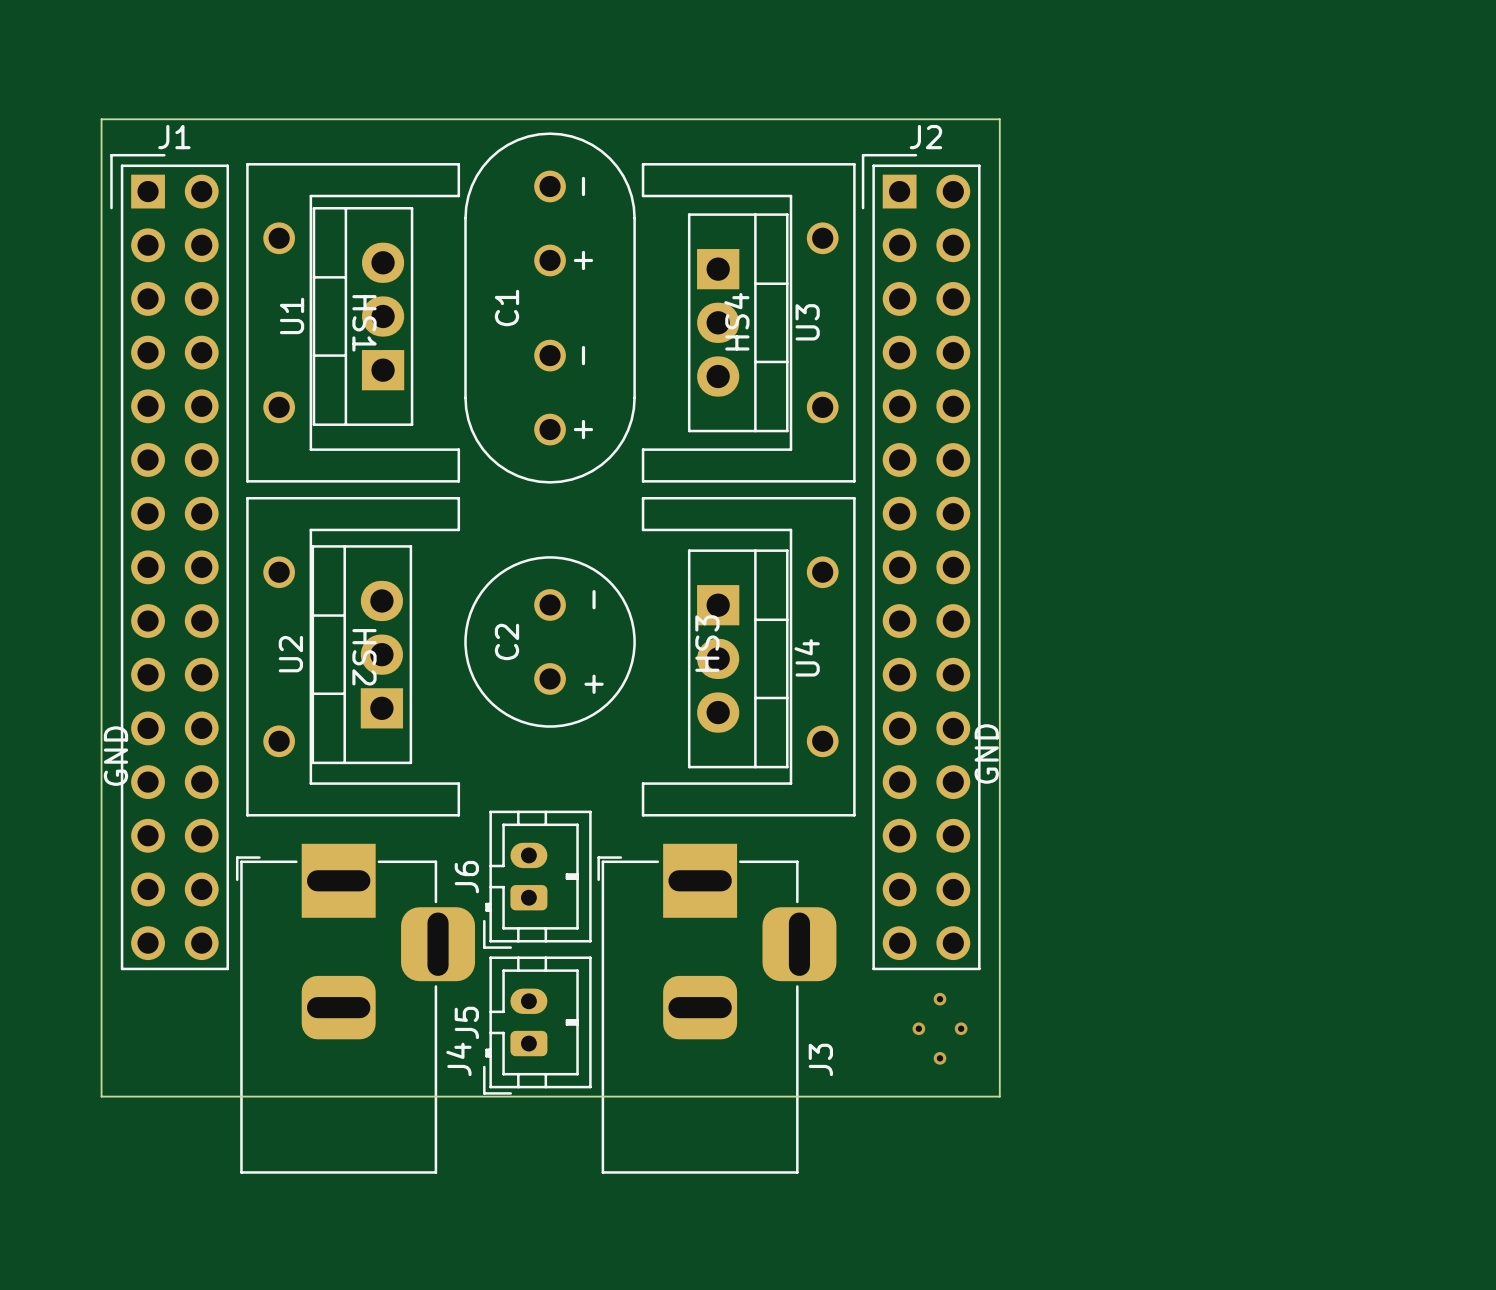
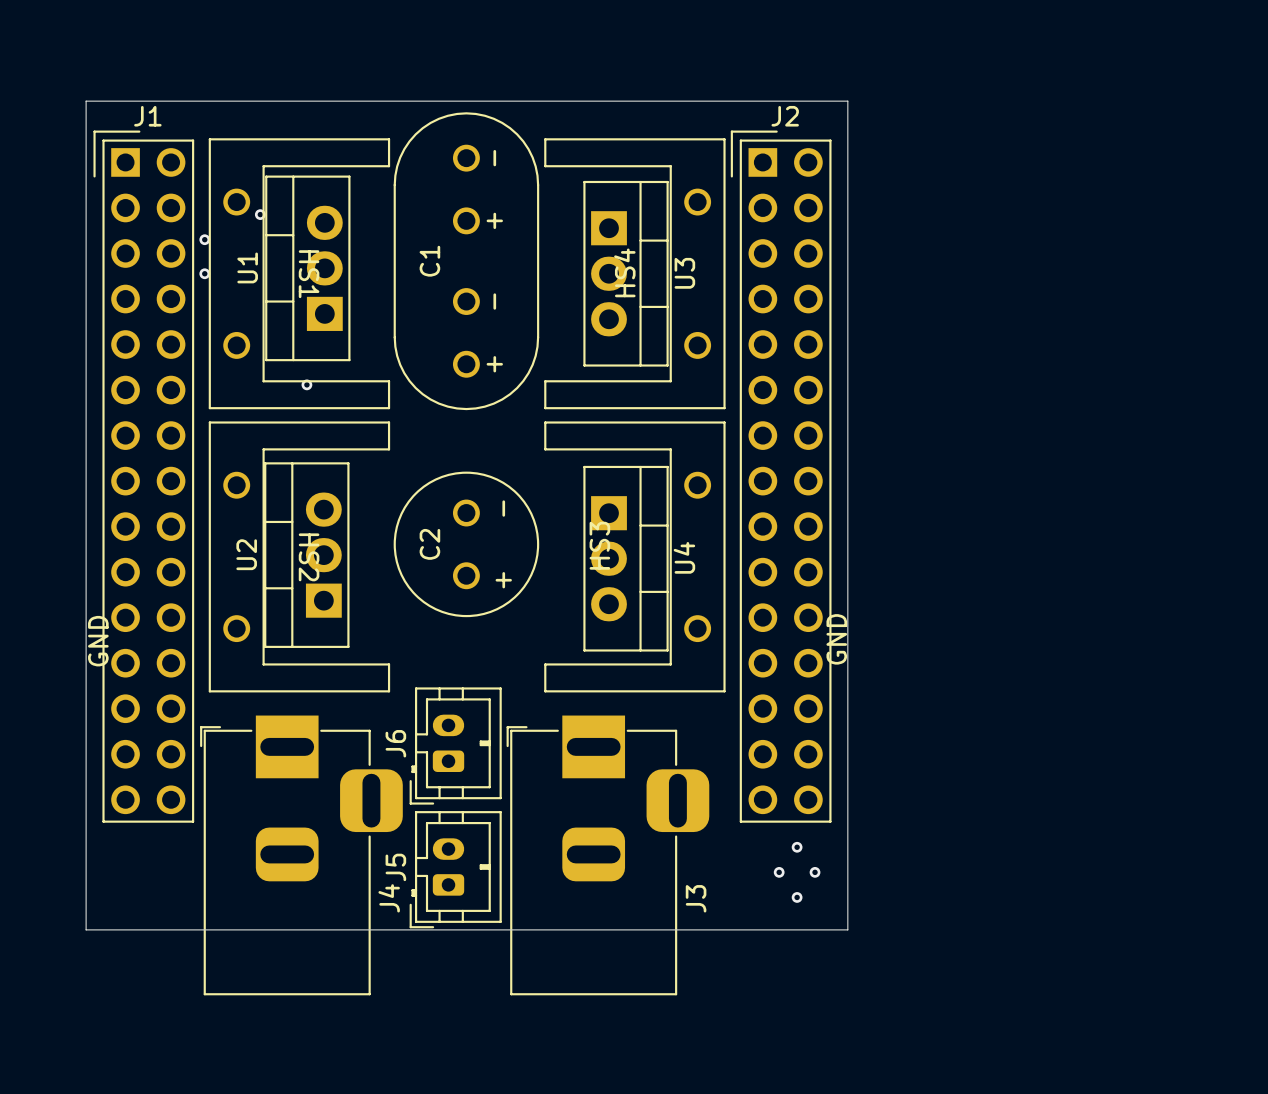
via: none -> (260, 214)
via: none -> (204, 239)
via: none -> (204, 273)
via: none -> (306, 384)

